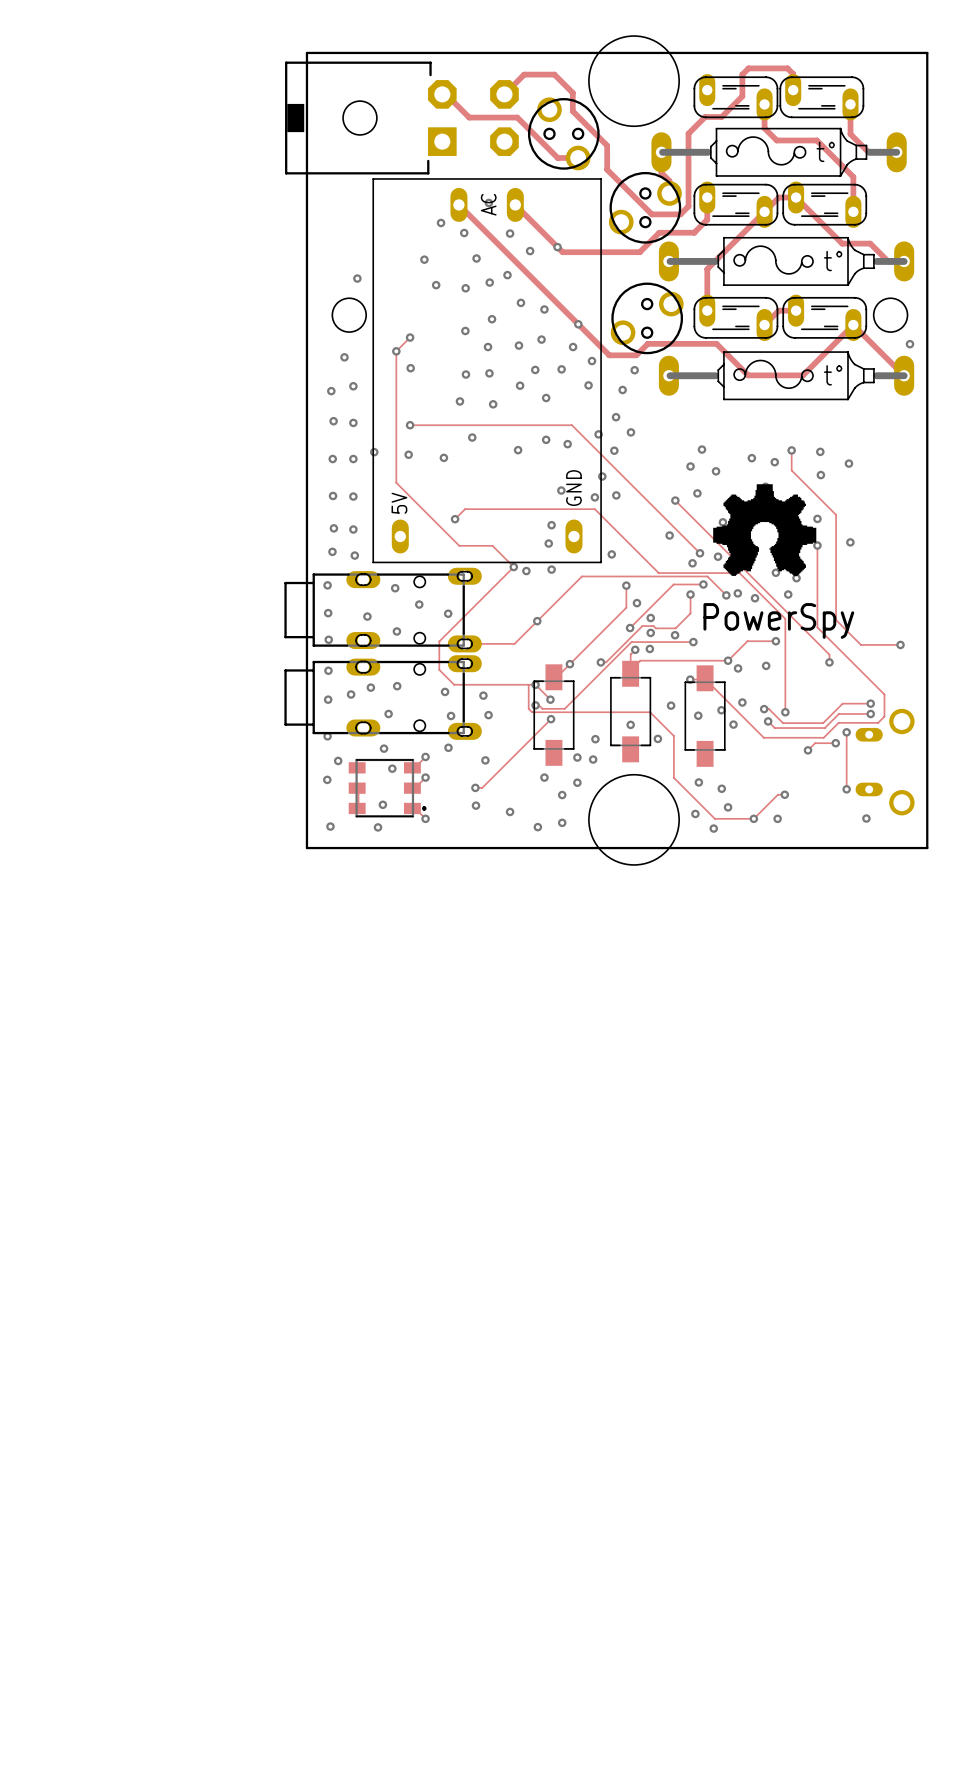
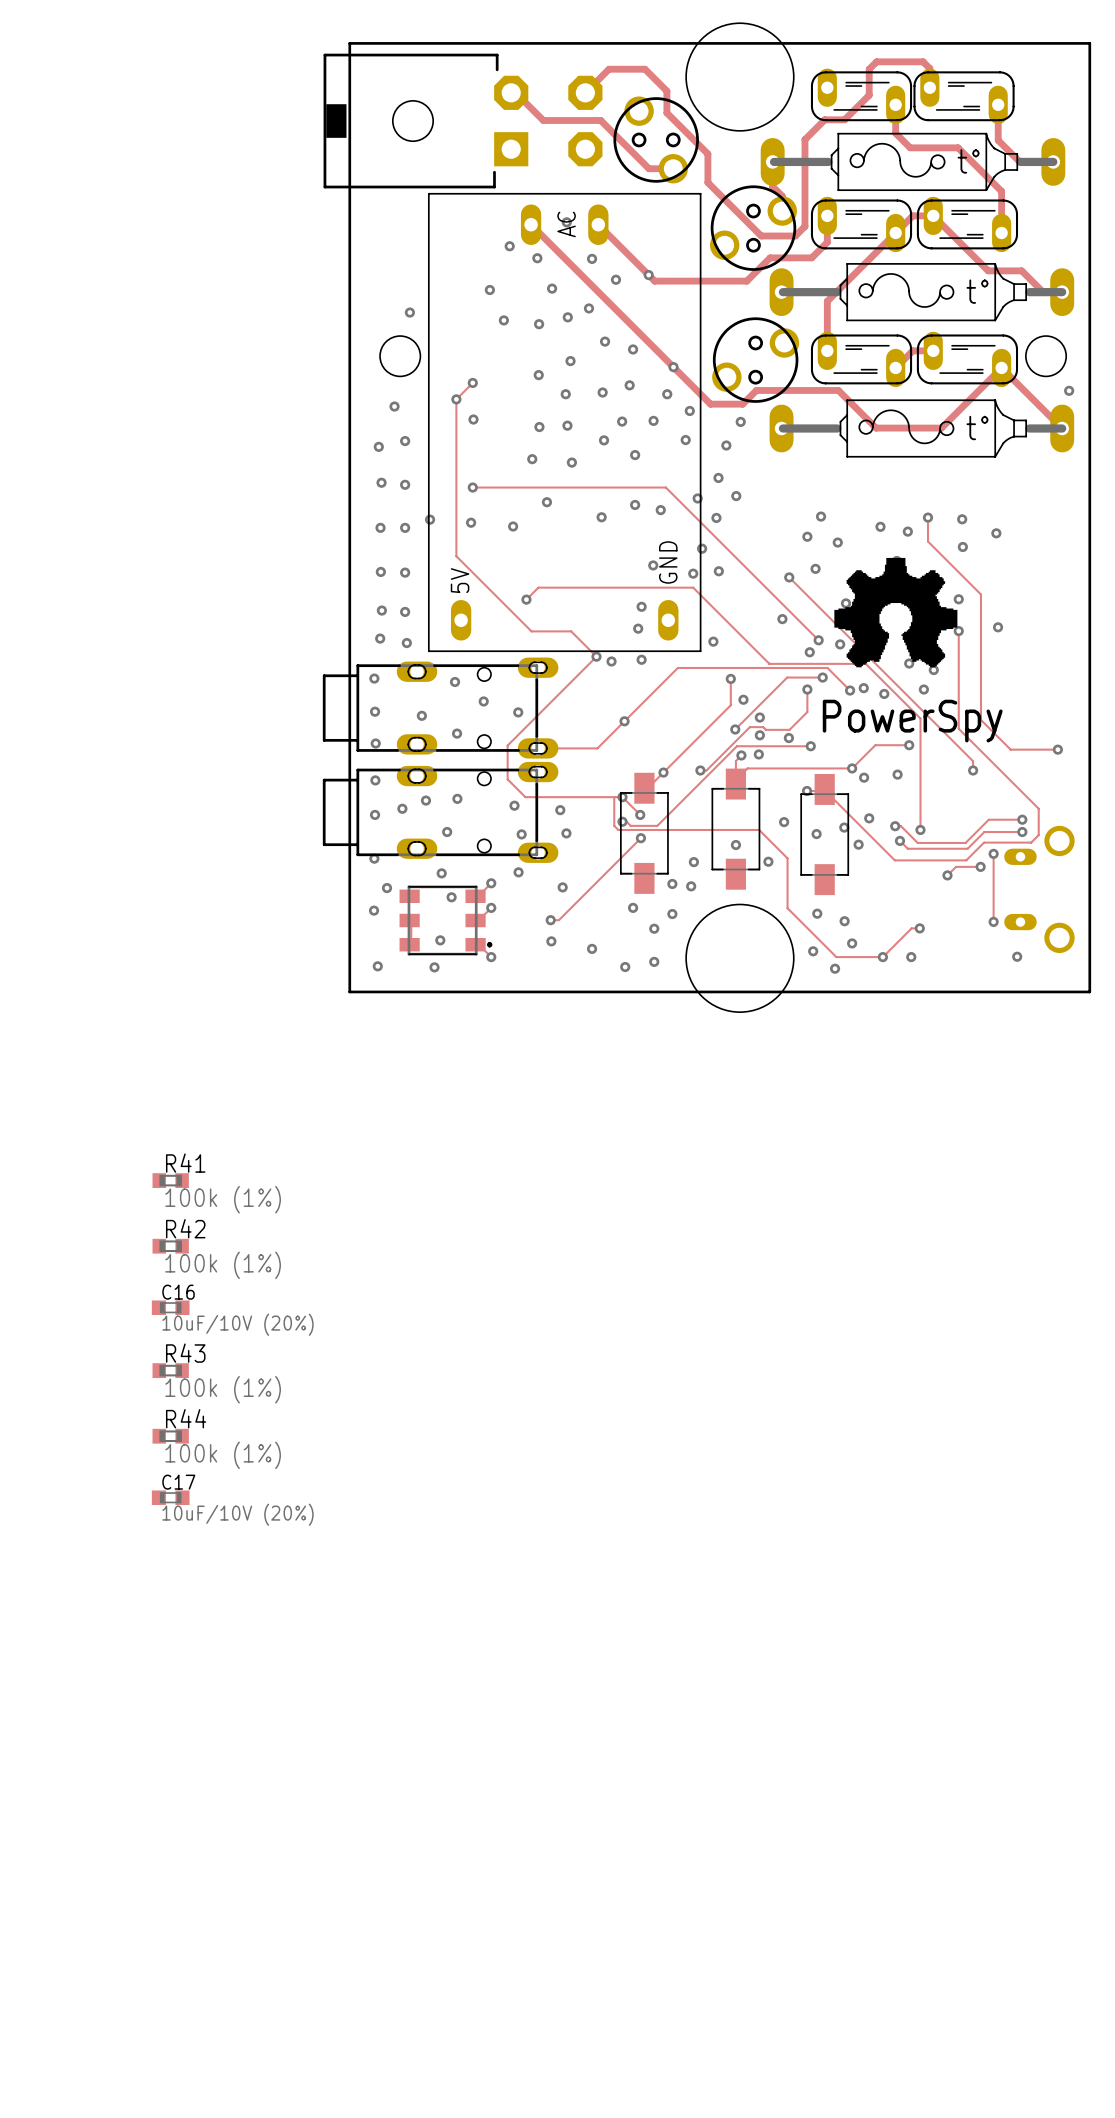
R41: none -> 100k (1%) (170, 1180)
R42: none -> 100k (1%) (170, 1246)
C16: none -> 10uF/10V (20%) (170, 1307)
R43: none -> 100k (1%) (170, 1370)
R44: none -> 100k (1%) (170, 1436)
C17: none -> 10uF/10V (20%) (170, 1497)

